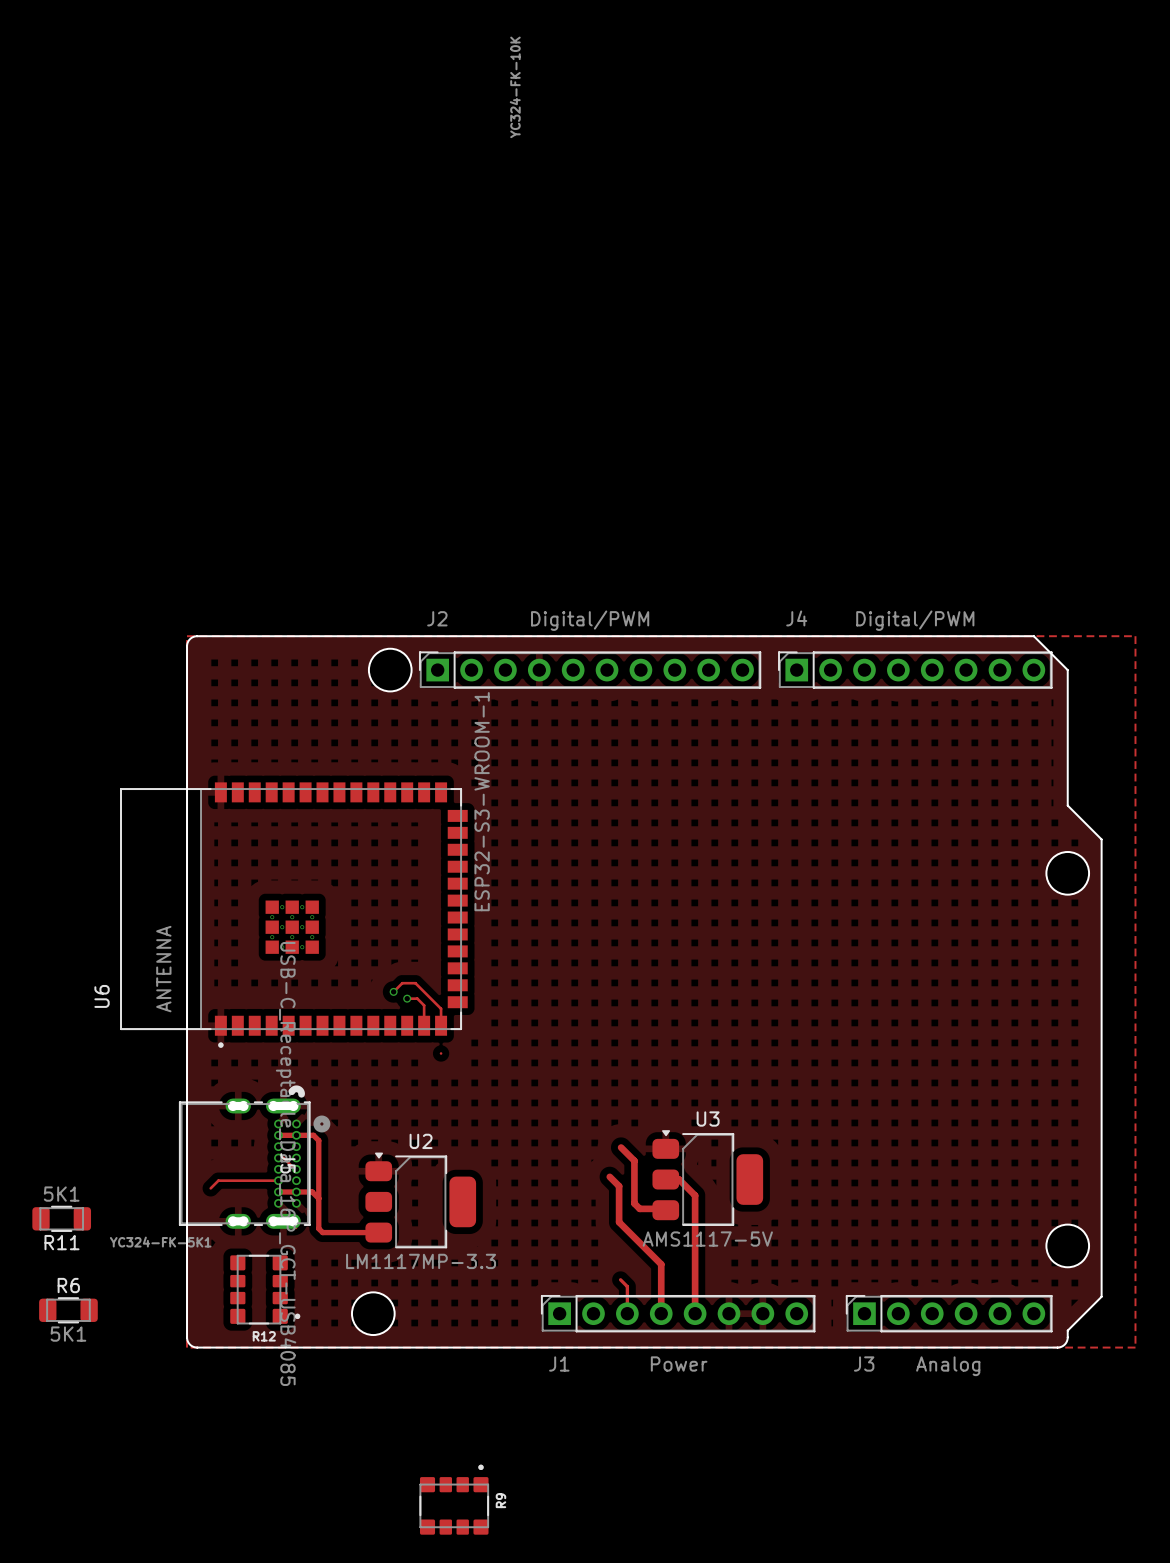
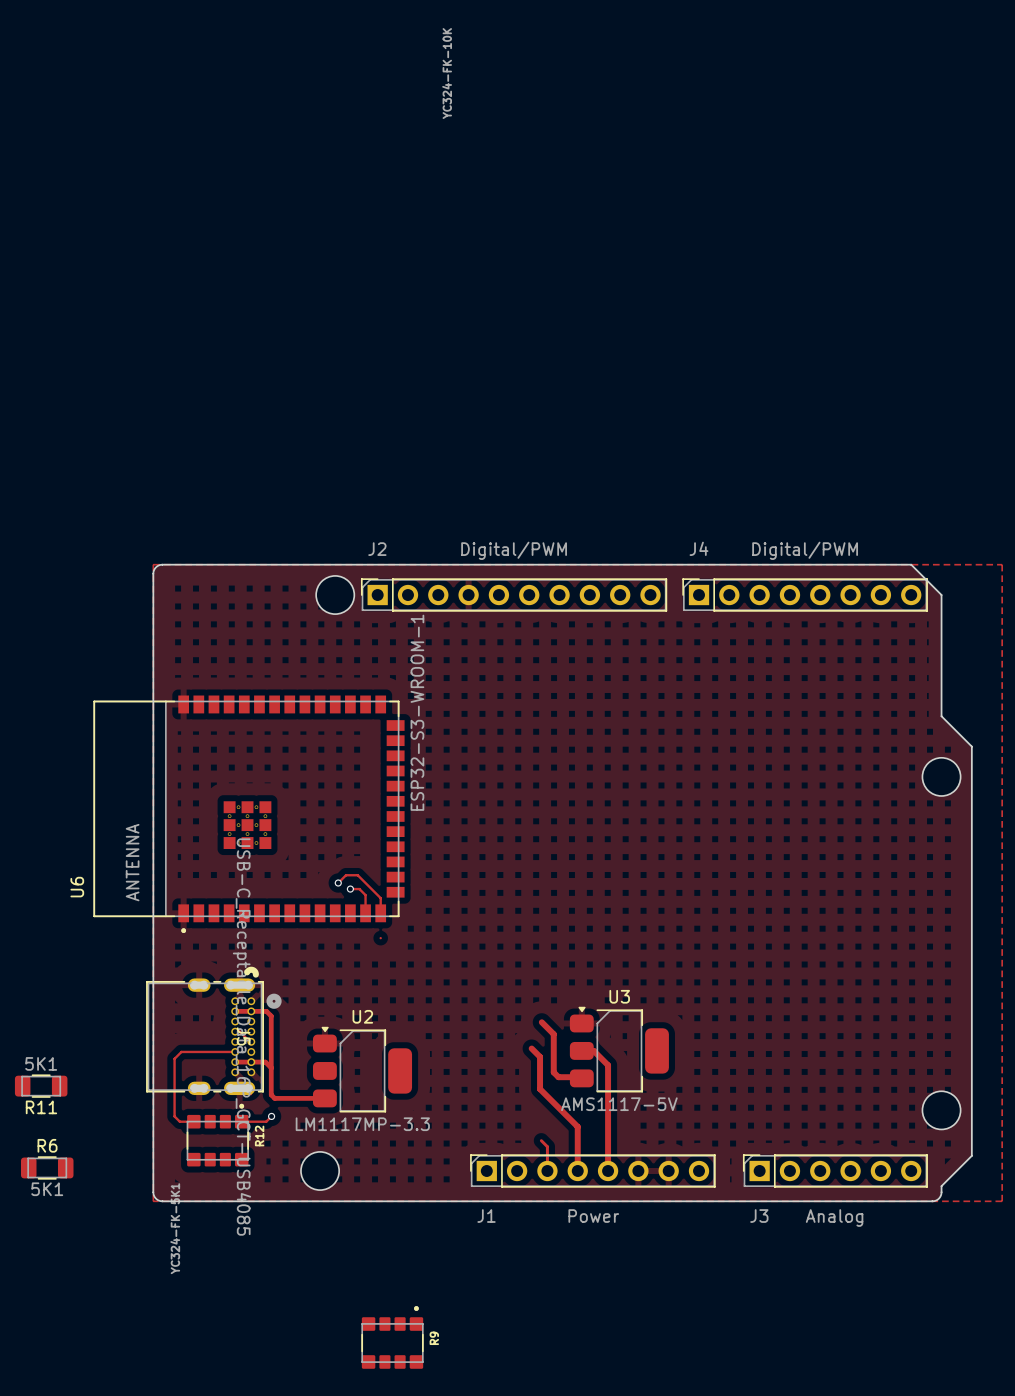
track: none -> (174, 1058) (174, 1116) (179, 1121) (193, 1121)
track: none -> (271, 1116) (266, 1121) (241, 1121)
via: none -> (271, 1116)
R12 rotation: 0° (265, 1289) -> 90° counterclockwise (217, 1135)

